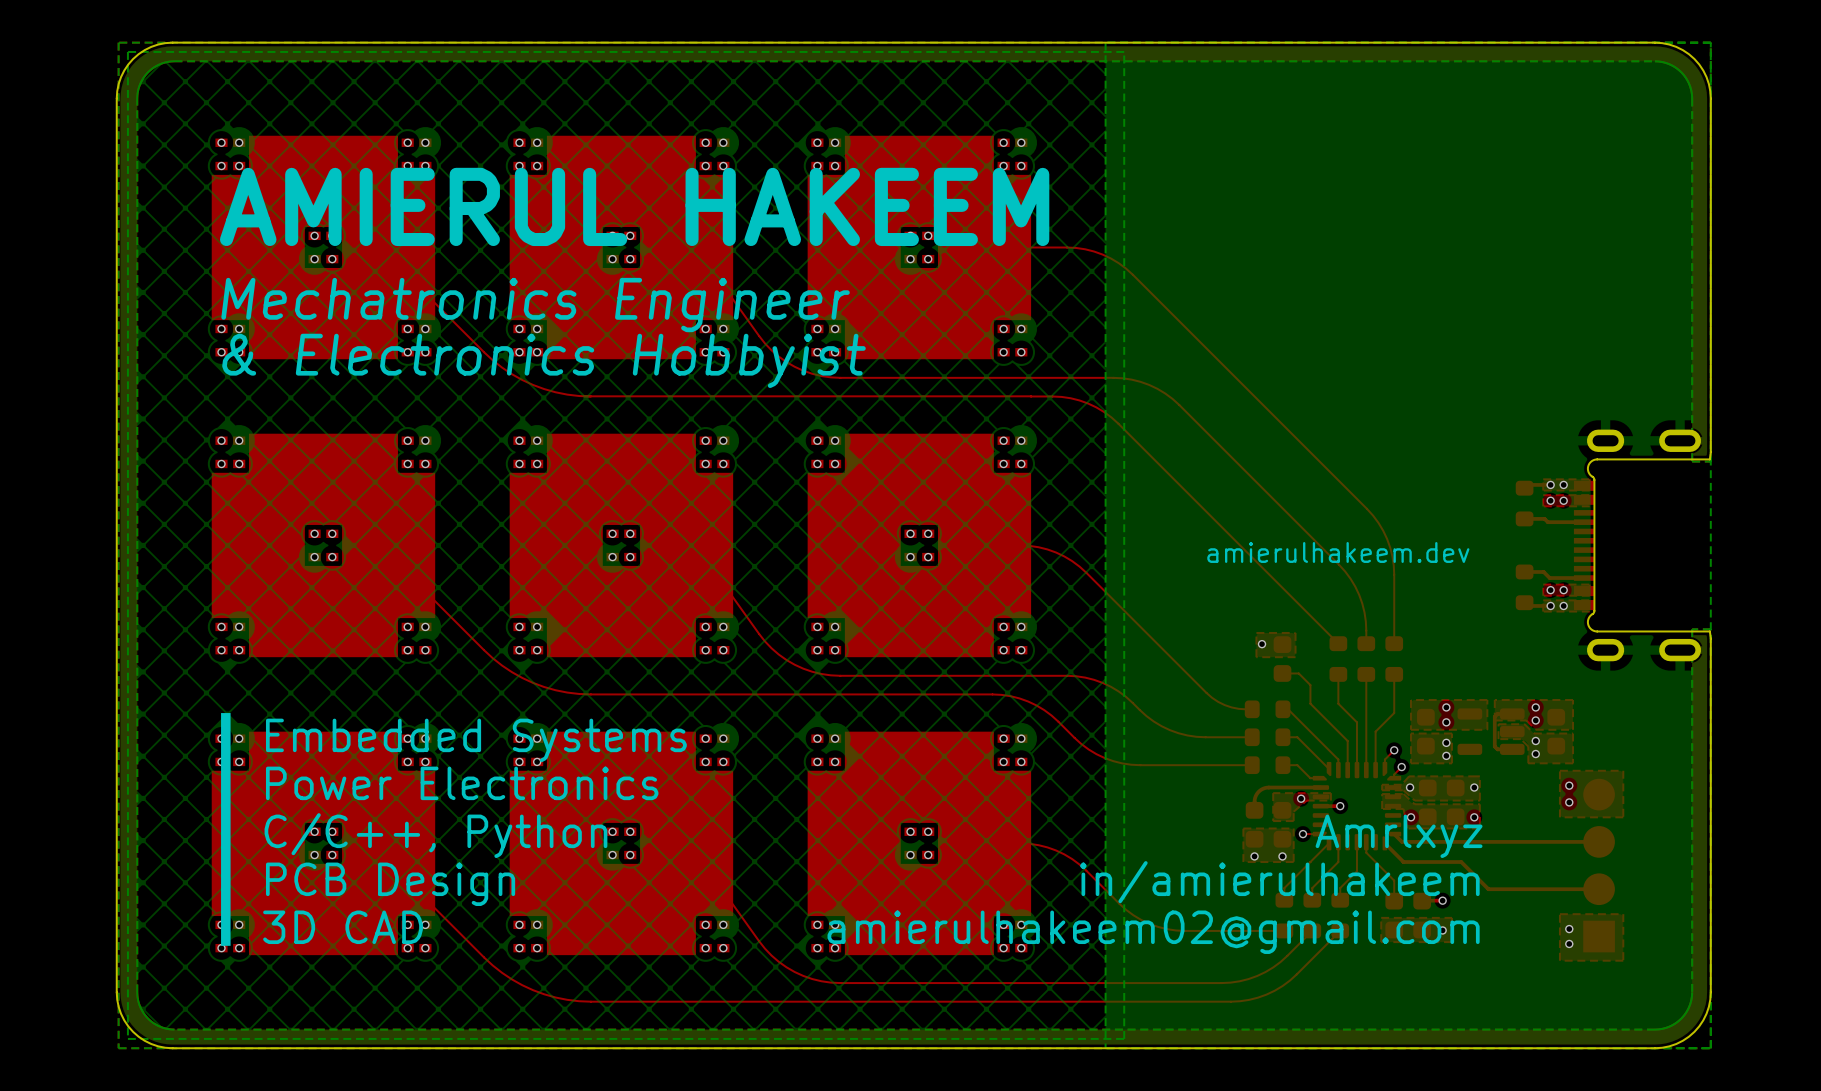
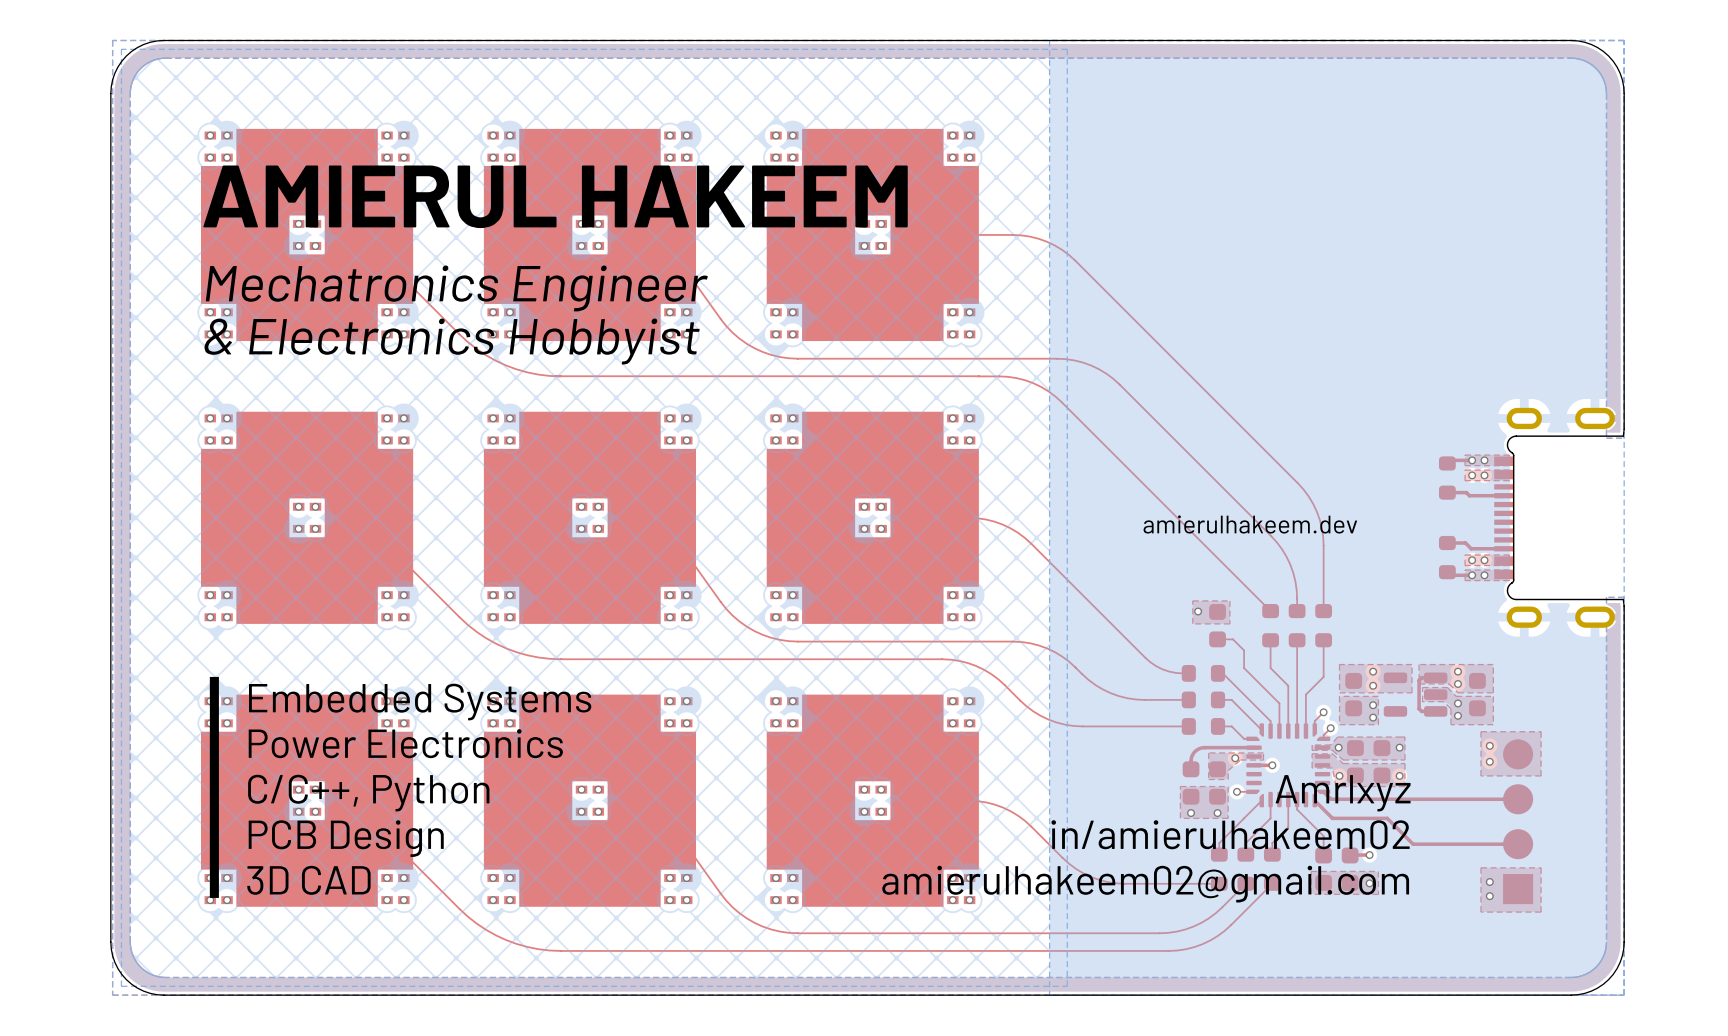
text: in/amierulhakeem (1279, 882) -> in/amierulhakeem02 (1230, 834)

